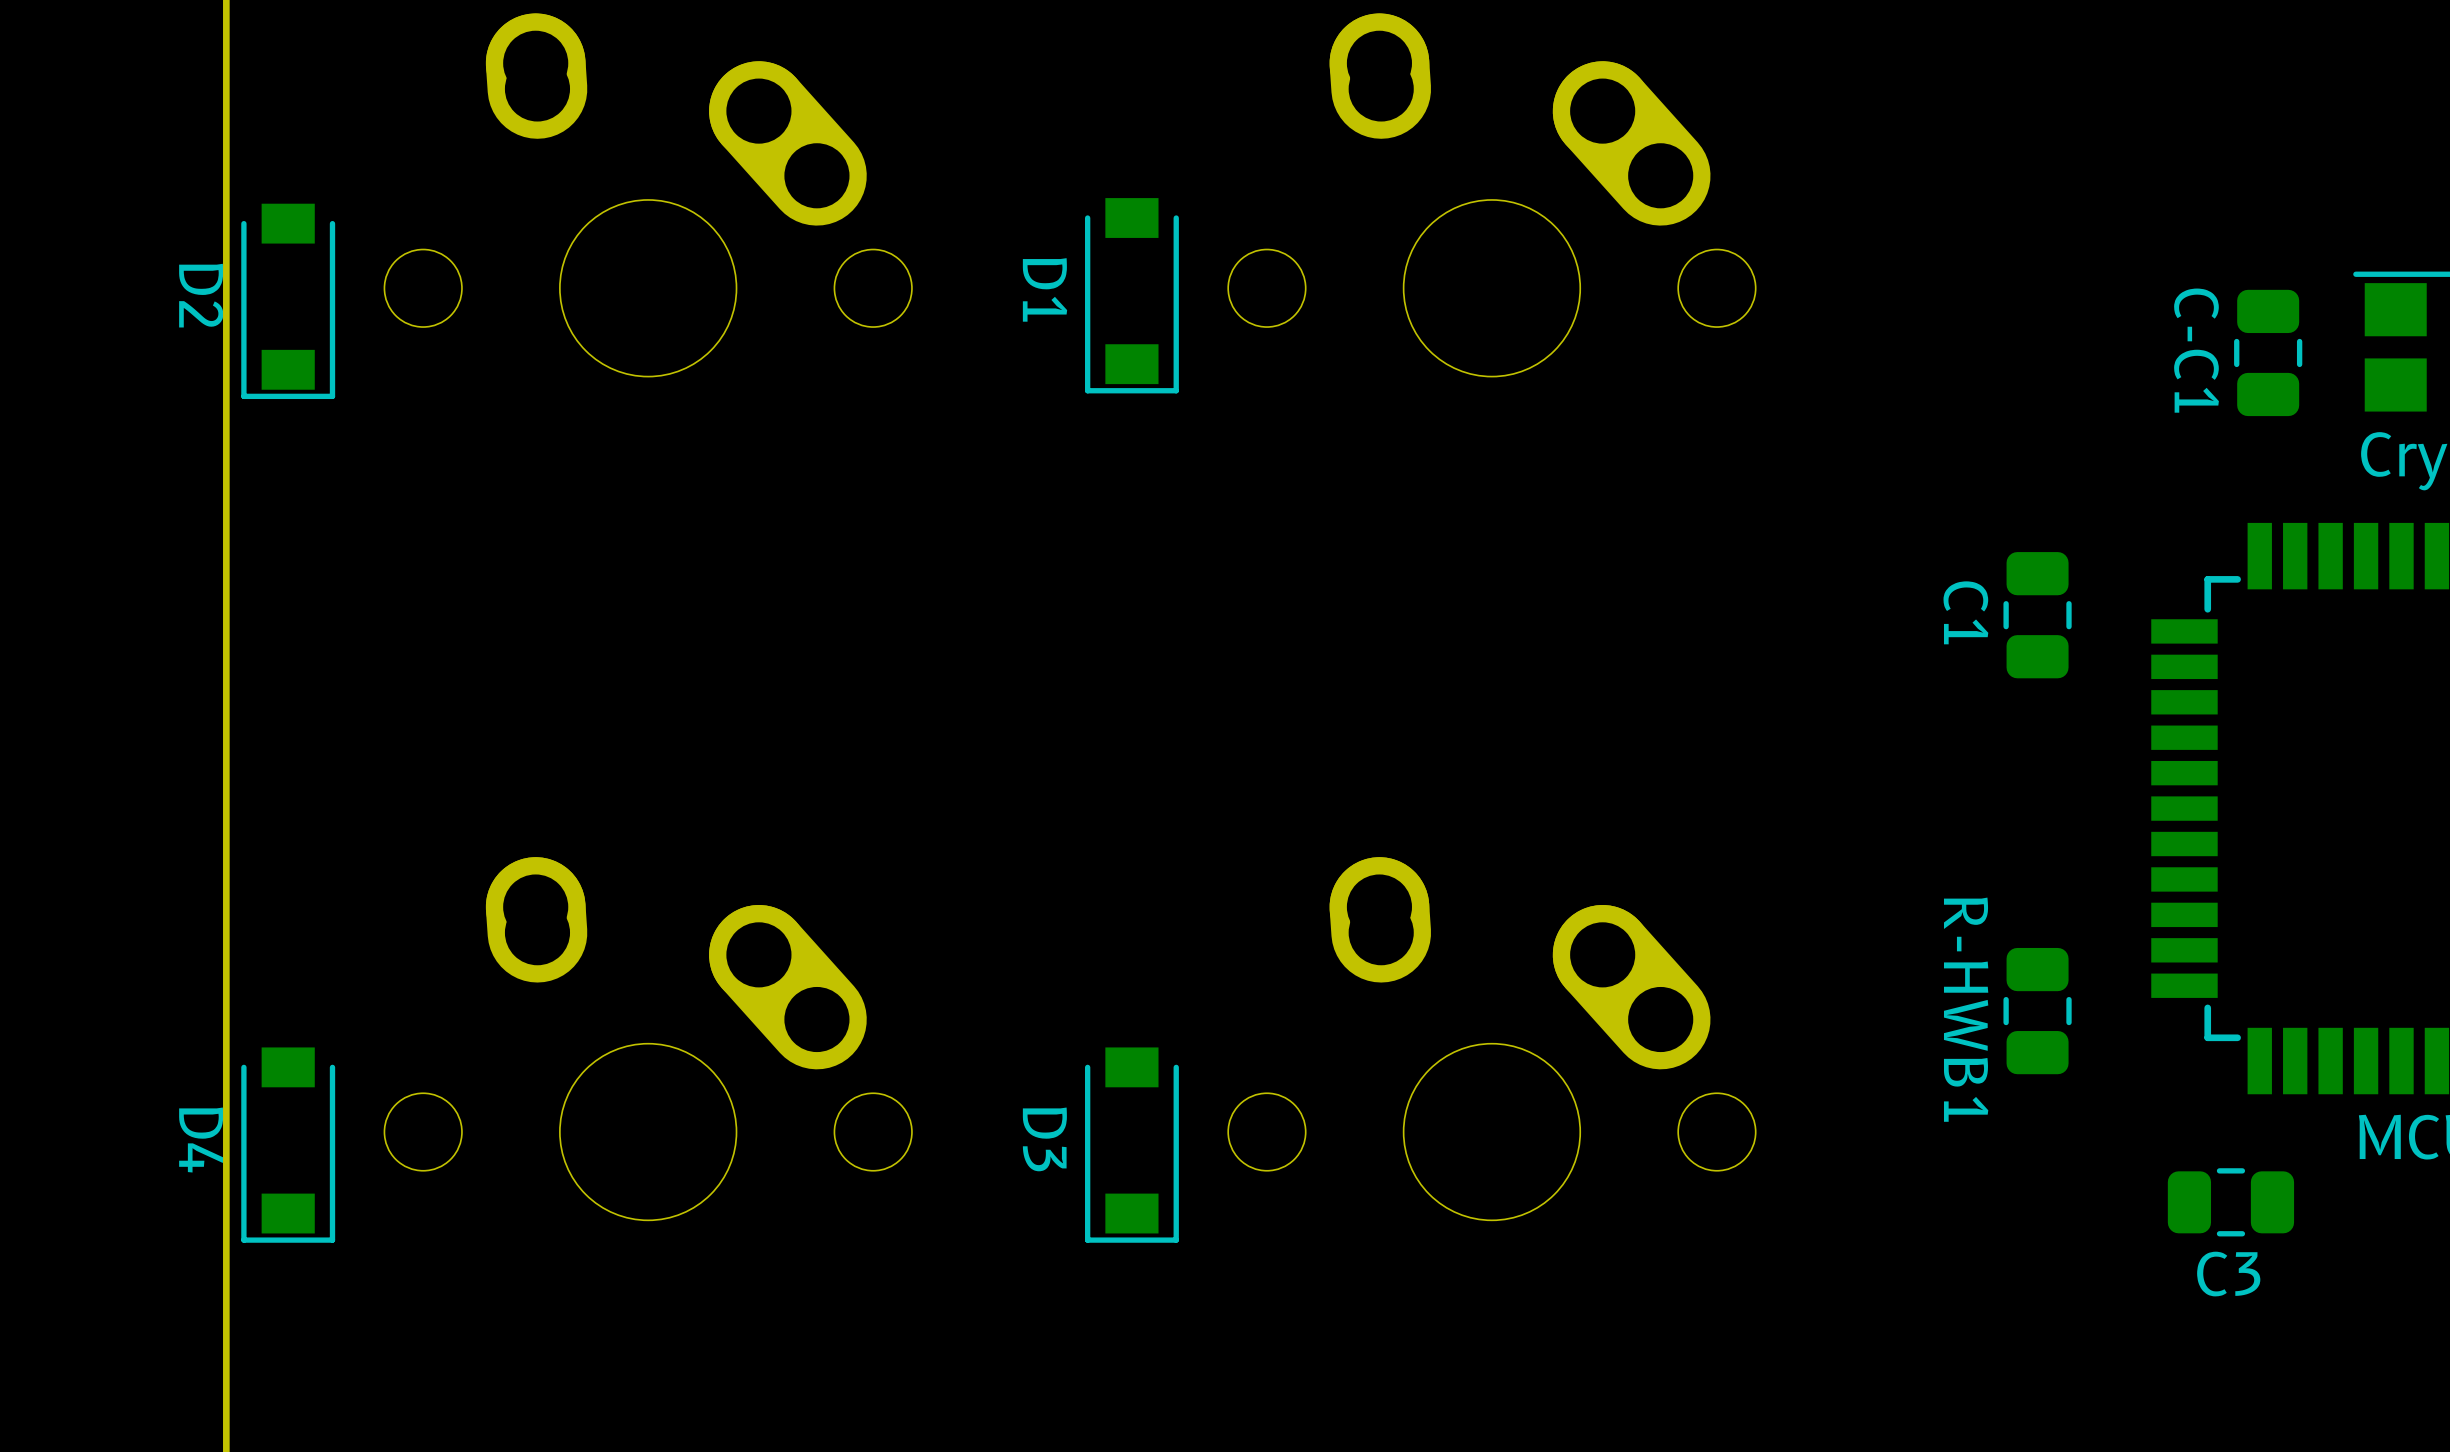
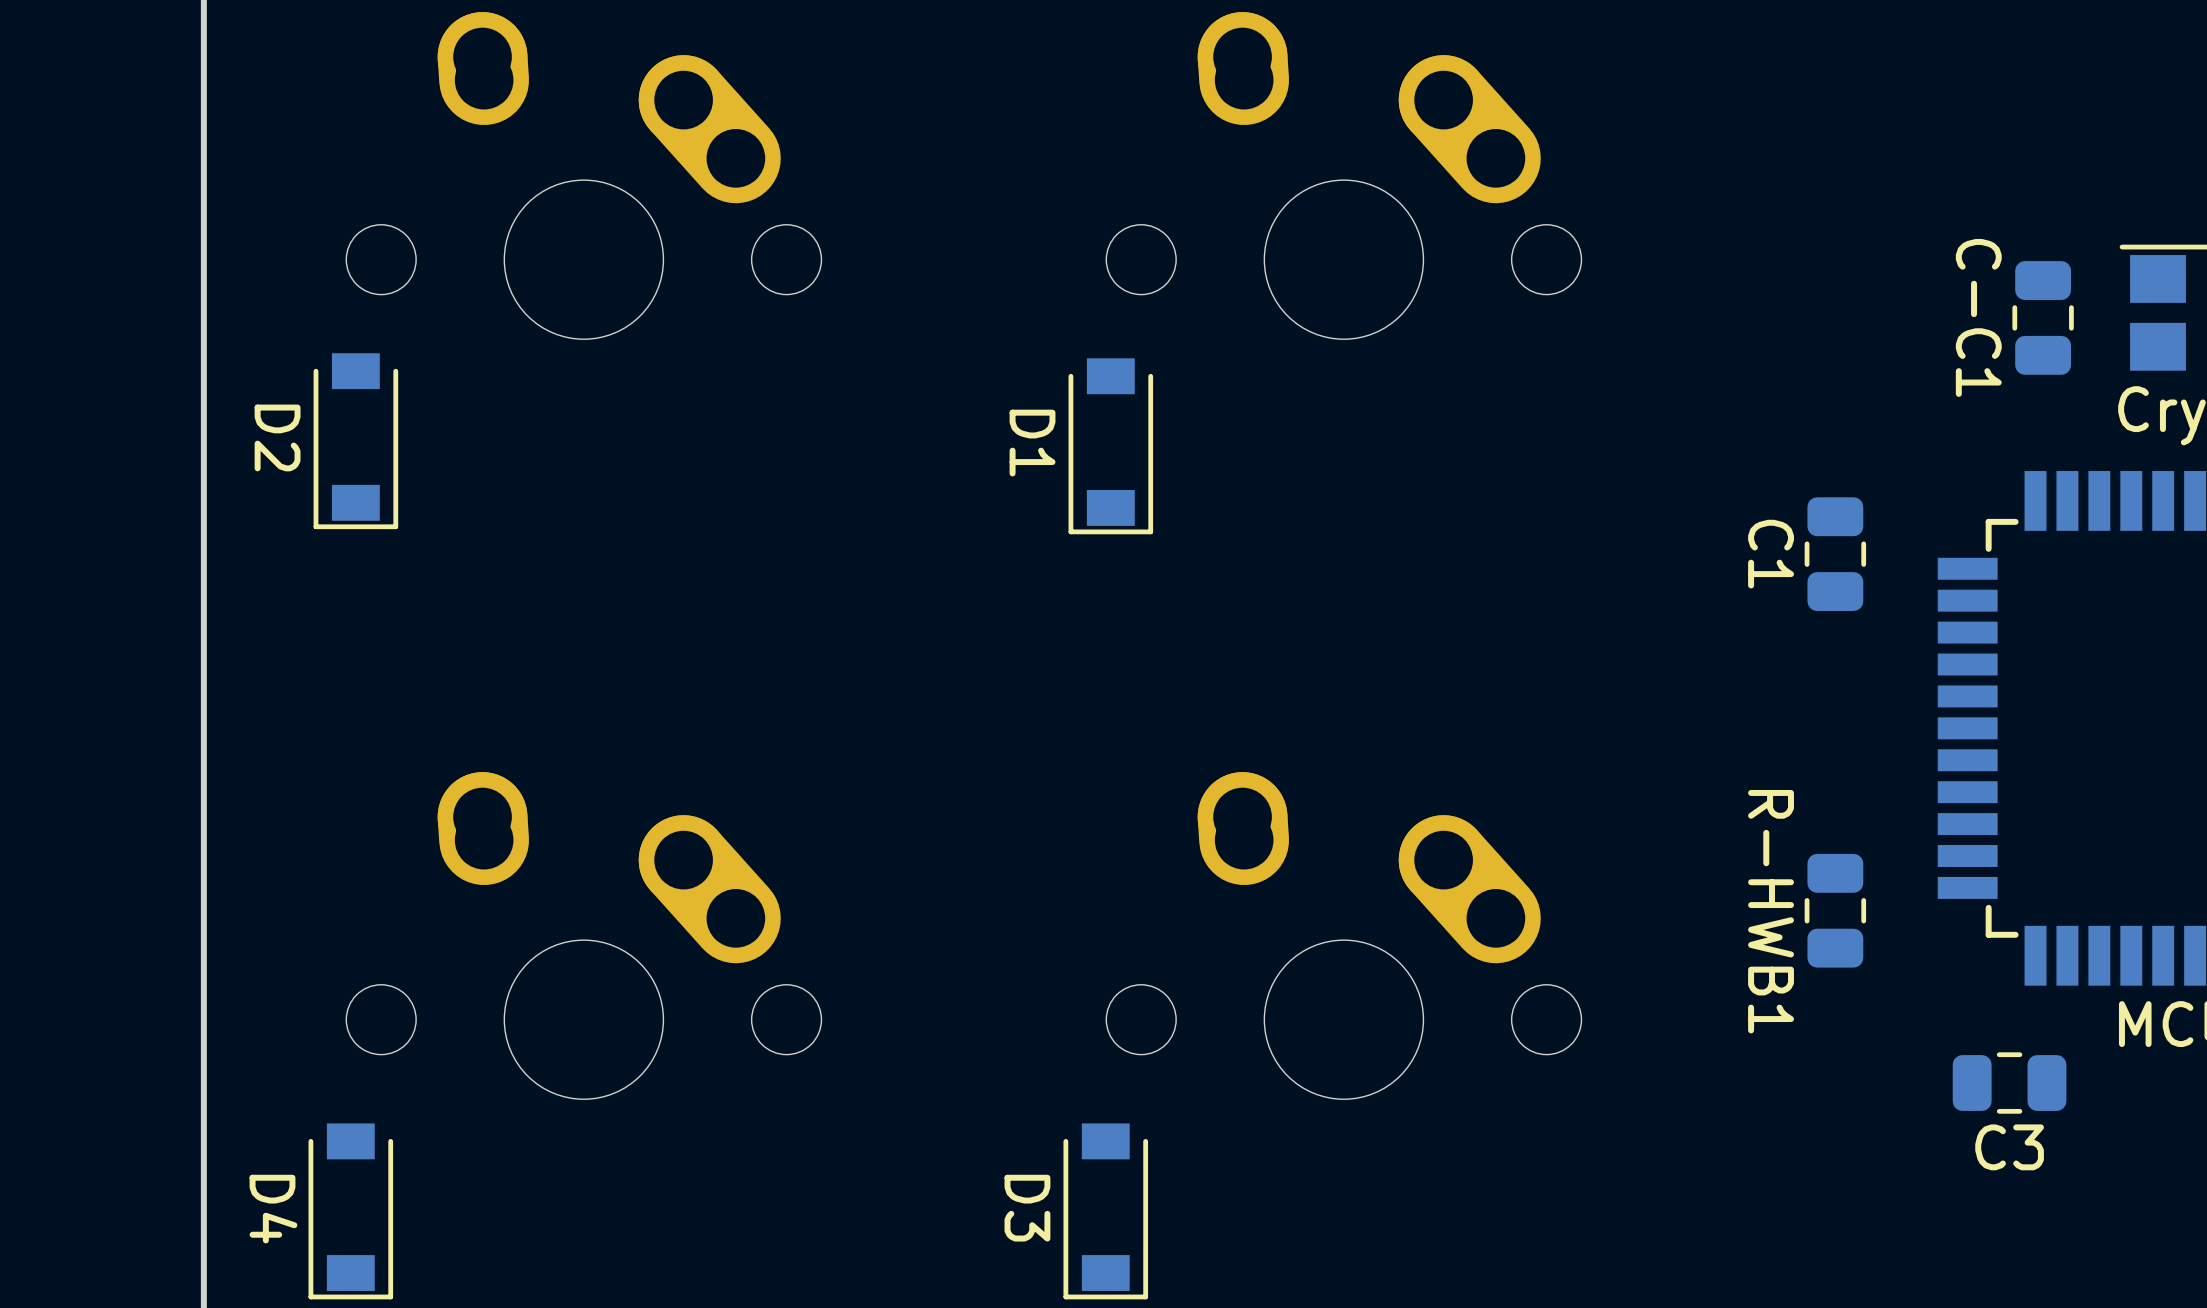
D1 position: (1131, 295) -> (1110, 446)
D2 position: (288, 301) -> (355, 441)
D4 position: (288, 1145) -> (350, 1211)
D3 position: (1131, 1145) -> (1105, 1211)

